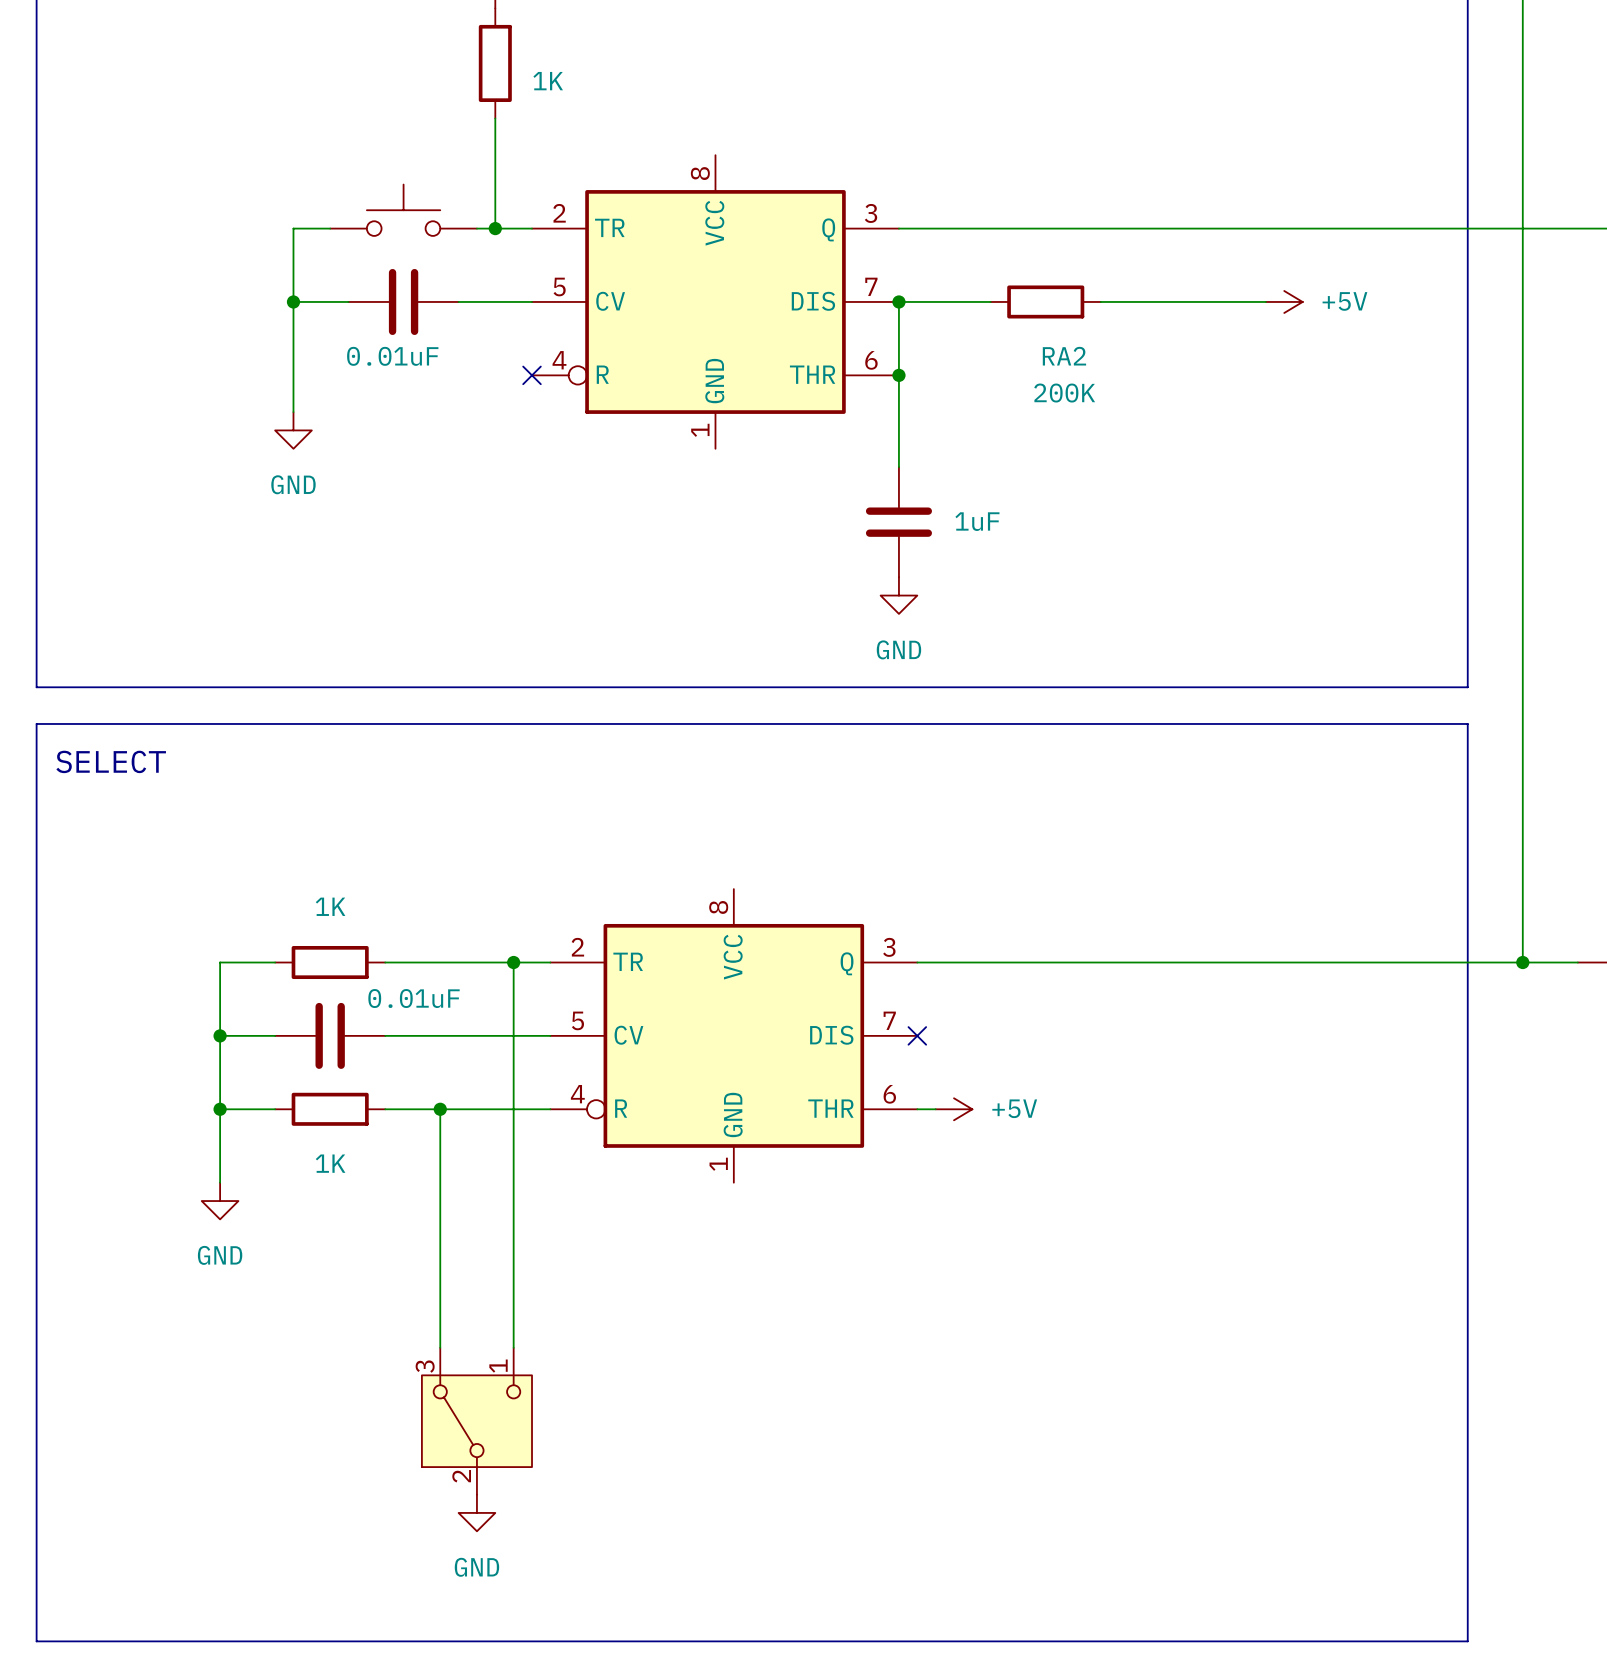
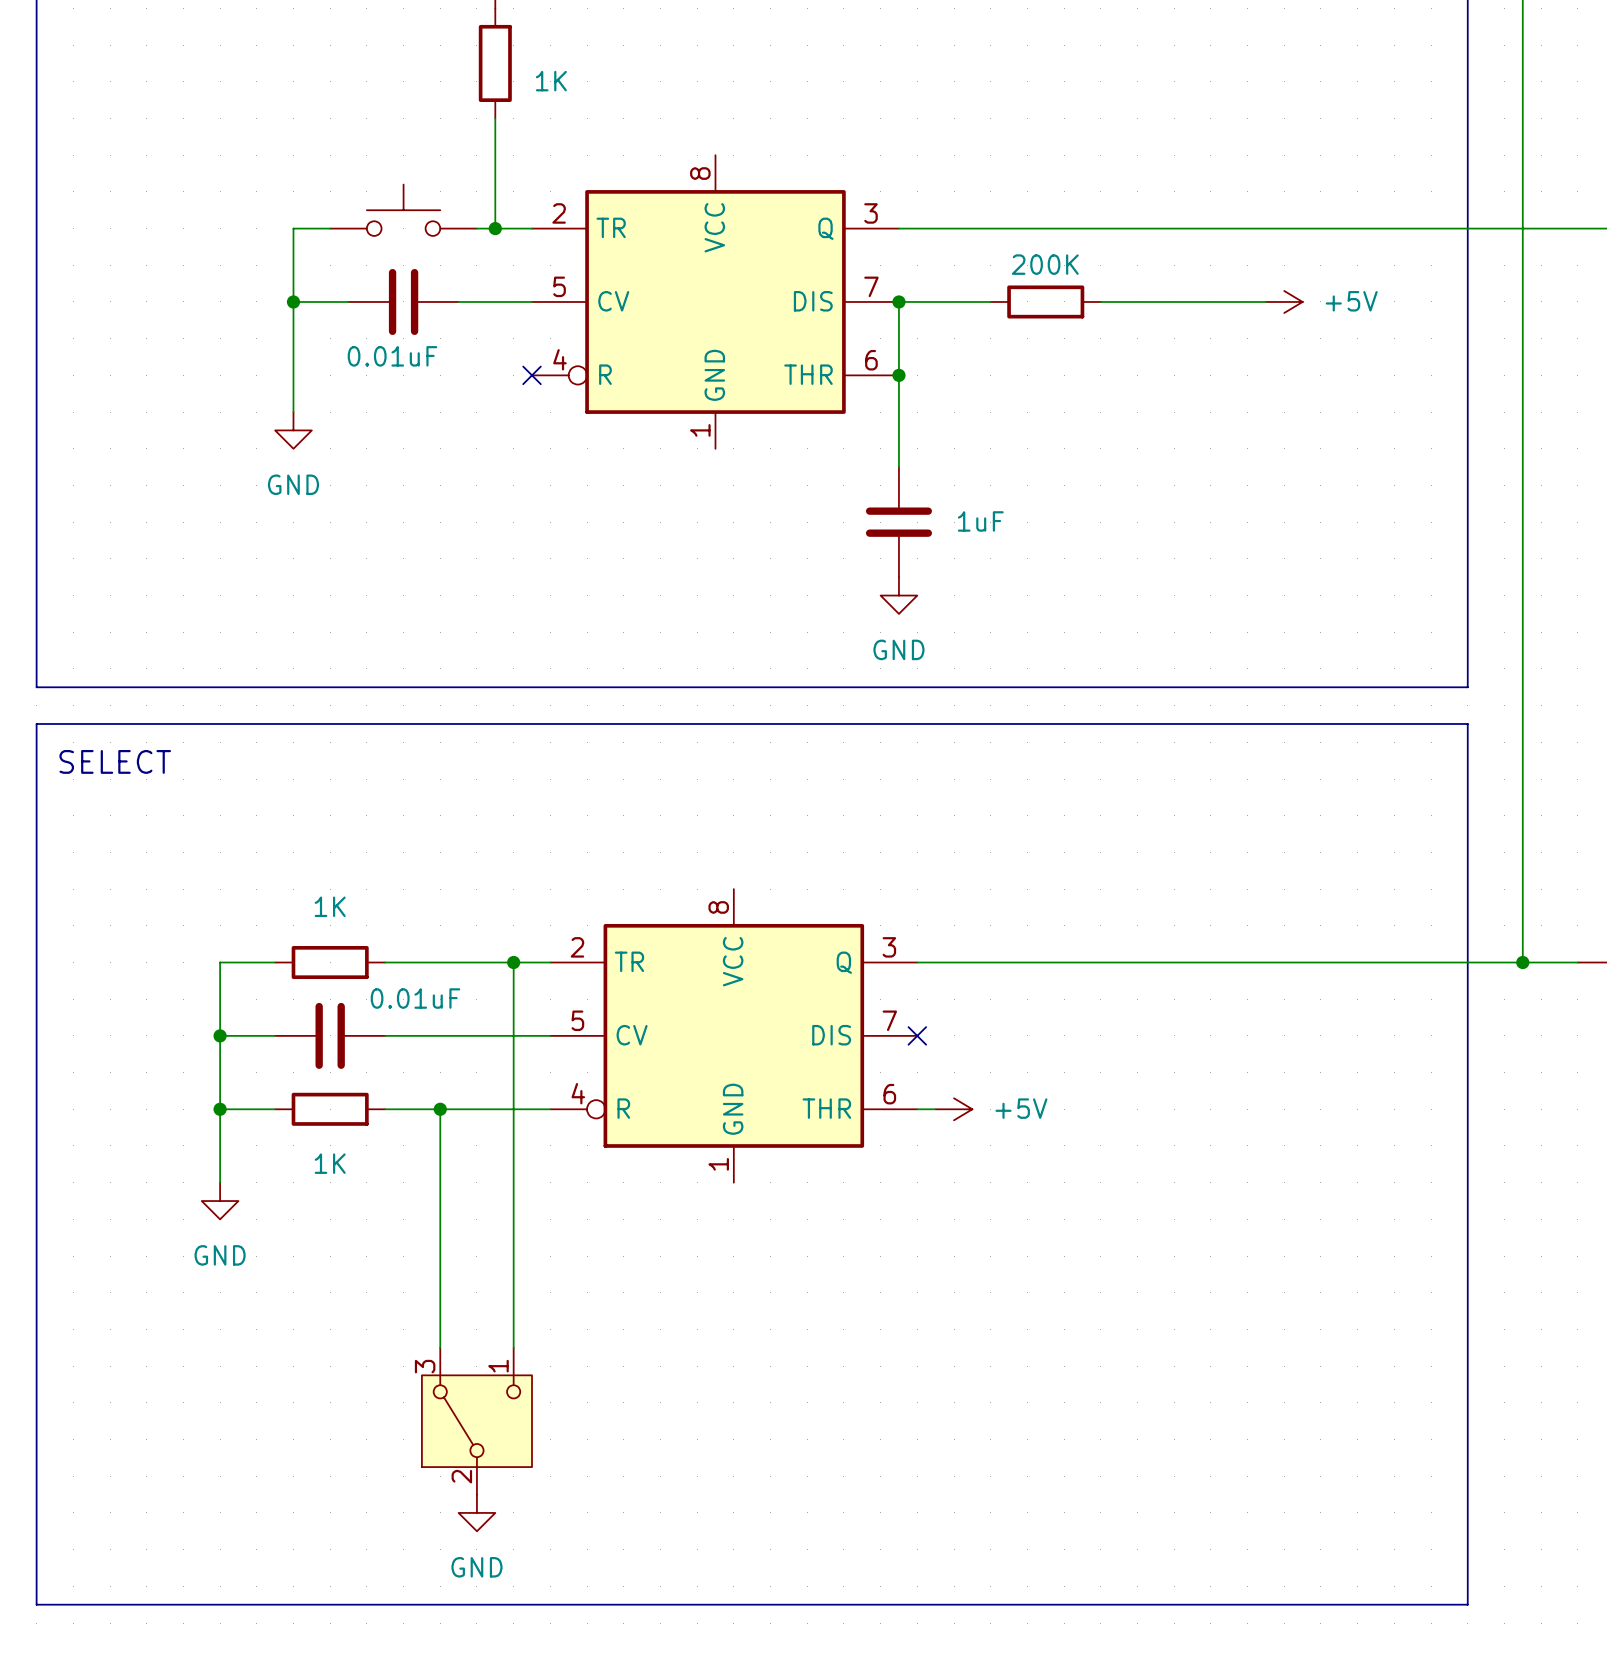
RA2 name: RA2 (1064, 356) -> none
RA2 value position: 200K (1064, 393) -> 200K (1045, 264)
line: (36, 1604) (36, 1641) (1467, 1641) (1467, 1604) -> (36, 1604) (1467, 1604)

